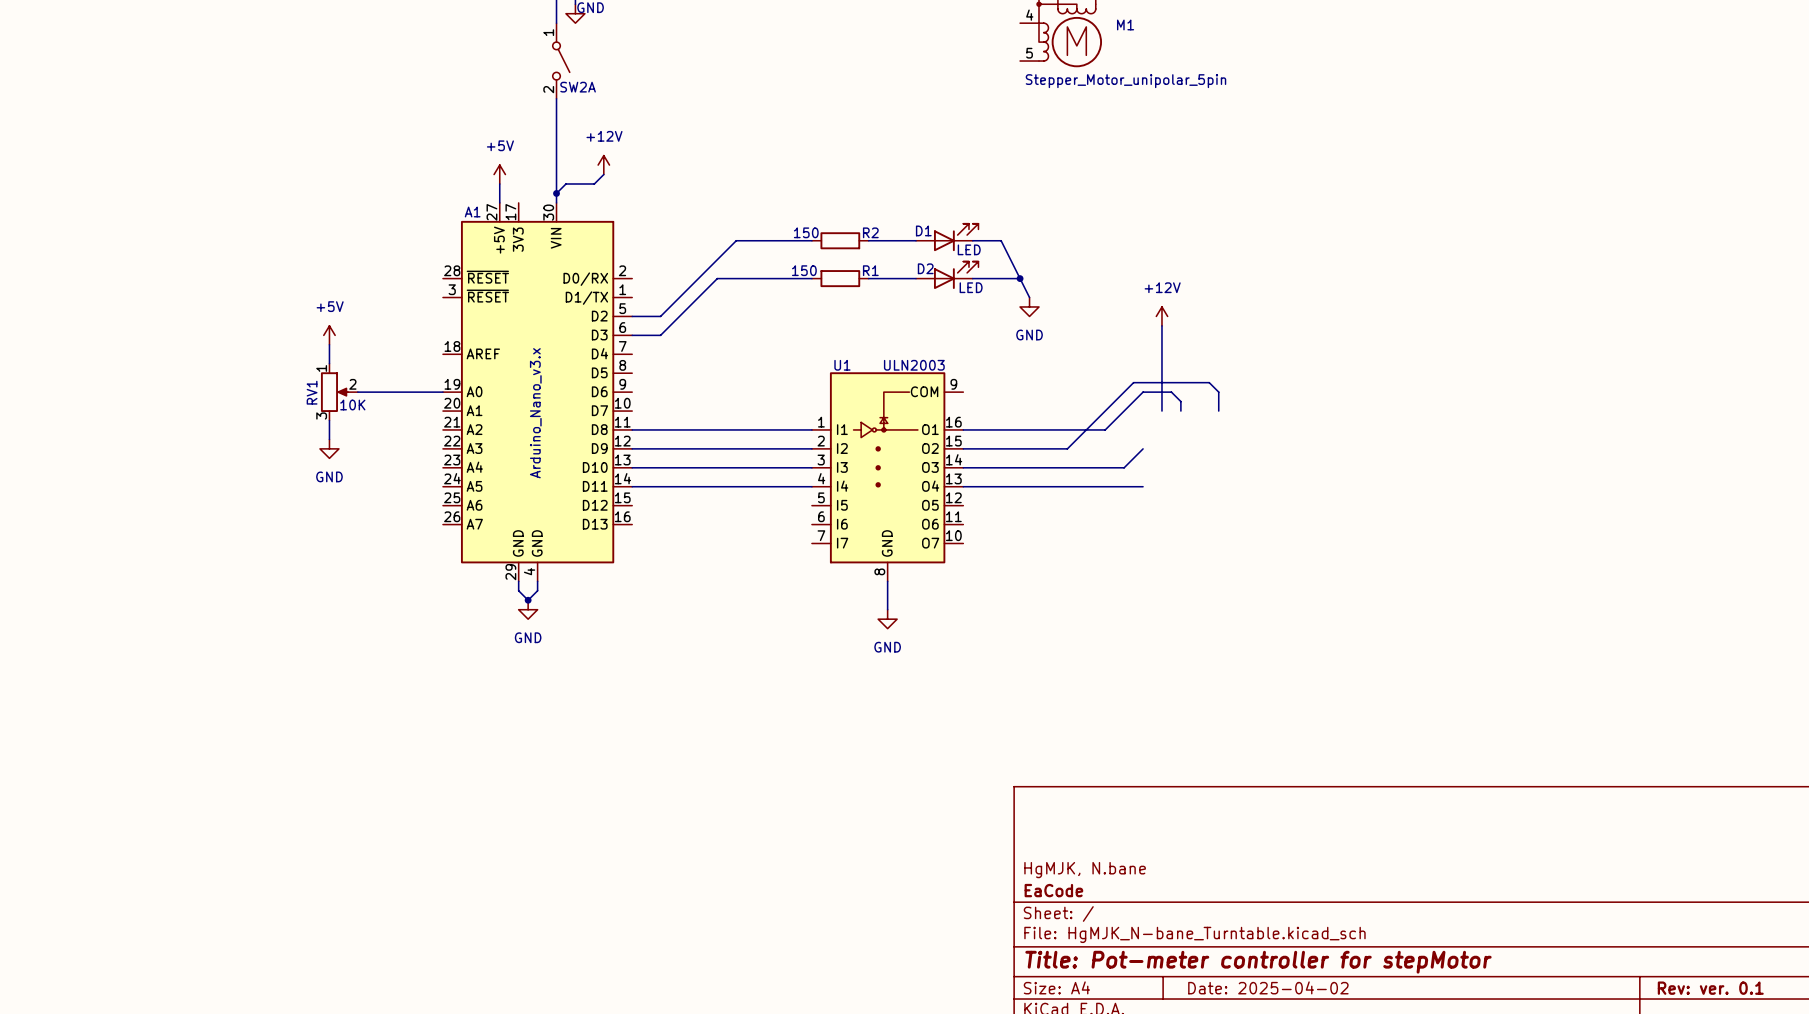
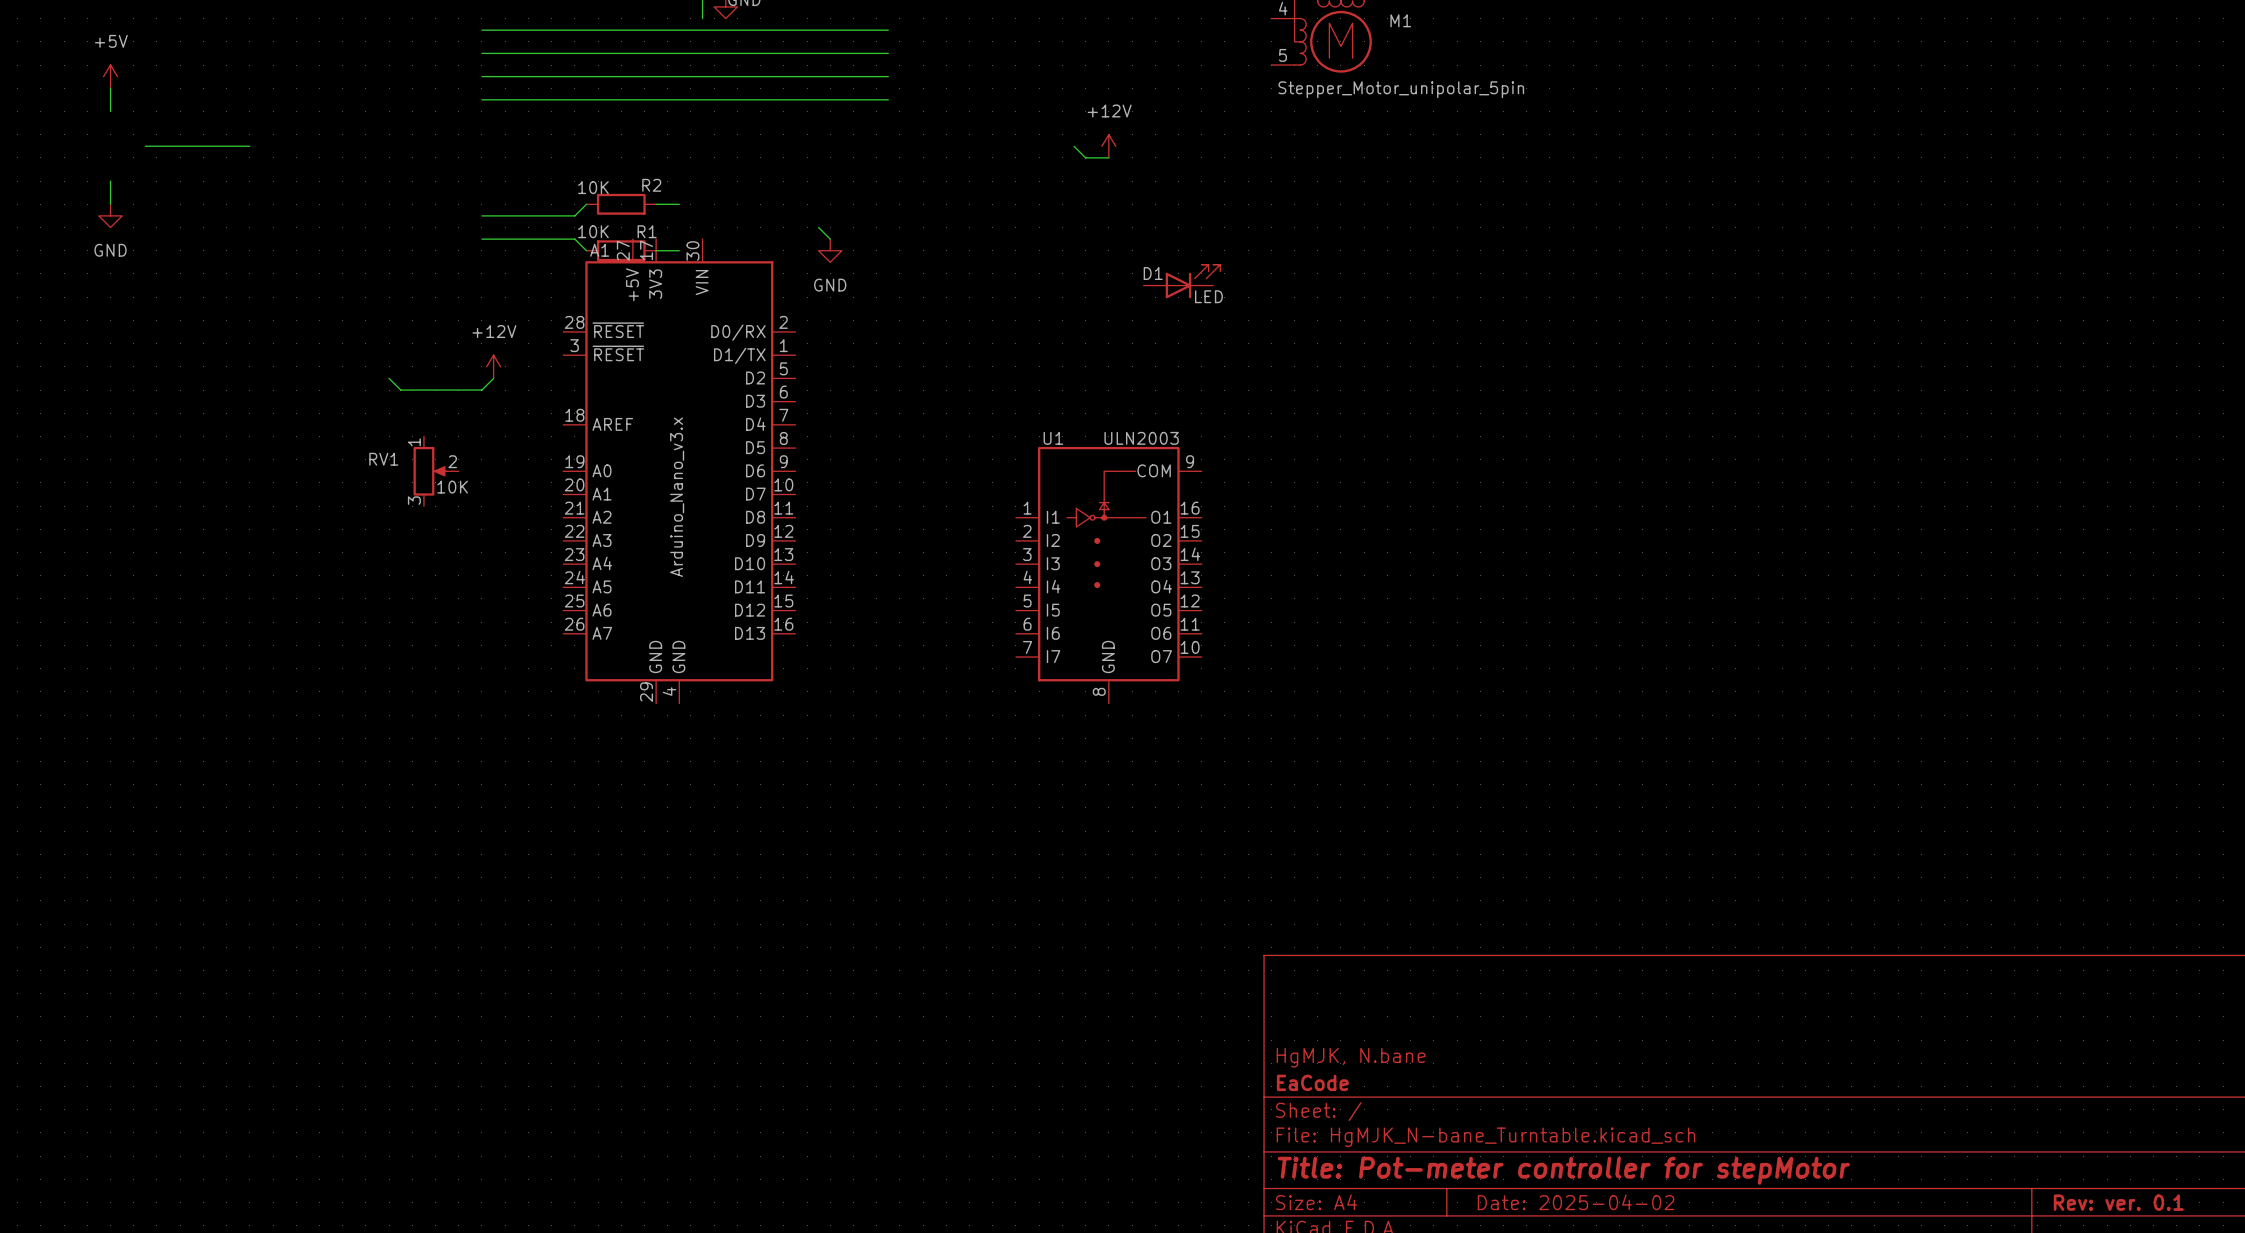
wire: none -> (481, 30) (888, 30)
wire: none -> (481, 53) (888, 53)
SW2A: (561, 61) -> none
power symbol: none -> +5V (110, 76)
wire: none -> (481, 76) (888, 76)
wire: none -> (110, 88) (110, 111)
wire: none -> (481, 99) (888, 99)
wire: (556, 98) (556, 202) -> none
wire: none -> (145, 146) (249, 146)
wire: none -> (1074, 146) (1085, 157) (1108, 157)
power symbol: none -> +12V (1108, 146)
wire: none -> (110, 181) (110, 204)
power symbol: +12V (603, 165) -> none
wire: none -> (586, 204) (574, 215) (481, 215)
power symbol: +5V (499, 174) -> none
wire: none -> (656, 204) (679, 204)
wire: (603, 174) (594, 183) (565, 183) (556, 193) -> none
power symbol: none -> GND (110, 215)
wire: (499, 183) (499, 202) -> none
junction: (556, 193) -> none
wire: none -> (818, 227) (830, 239)
wire: none -> (481, 239) (574, 239) (586, 250)
wire: none -> (656, 250) (679, 250)
power symbol: none -> GND (830, 250)
R2 value: 150 (806, 232) -> 10K (593, 187)
R2 name position: R2 (870, 232) -> R2 (651, 185)
wire: (811, 240) (736, 240) (660, 316) (632, 316) -> none
R2 position: (840, 240) -> (621, 204)
wire: (868, 240) (916, 240) -> none
wire: (972, 240) (1001, 240) (1029, 297) -> none
R1 value: 150 (804, 270) -> 10K (593, 231)
R1 name position: R1 (870, 270) -> R1 (647, 231)
D2: LED (947, 275) -> none
wire: (811, 278) (717, 278) (660, 335) (632, 335) -> none
R1 position: (840, 278) -> (621, 250)
wire: (868, 278) (916, 278) -> none
wire: (972, 278) (1020, 278) -> none
junction: (1020, 278) -> none
power symbol: none -> +12V (493, 366)
power symbol: GND (1029, 306) -> none
wire: none -> (389, 378) (400, 390) (481, 390) (493, 378)
power symbol: +12V (1161, 316) -> none
wire: (1161, 325) (1161, 411) -> none
power symbol: +5V (329, 335) -> none
wire: (329, 344) (329, 363) -> none
RV1 name rotation: 0° (312, 392) -> 90° clockwise (383, 459)
wire: (357, 392) (442, 392) -> none
wire: (1180, 411) (1180, 401) (1171, 392) (1143, 392) (1105, 429) (963, 429) -> none
wire: (1218, 411) (1218, 392) (1209, 382) (1133, 382) (1067, 448) (963, 448) -> none
wire: (329, 420) (329, 439) -> none
wire: (632, 429) (811, 429) -> none
power symbol: GND (329, 448) -> none
wire: (632, 448) (811, 448) -> none
wire: (1143, 448) (1124, 467) (963, 467) -> none
wire: (632, 467) (811, 467) -> none
wire: (632, 486) (811, 486) -> none
wire: (963, 486) (1143, 486) -> none
wire: (518, 581) (518, 590) (528, 600) (537, 590) (537, 581) -> none
wire: (887, 581) (887, 609) -> none
junction: (528, 600) -> none
power symbol: GND (528, 609) -> none
power symbol: GND (887, 619) -> none

